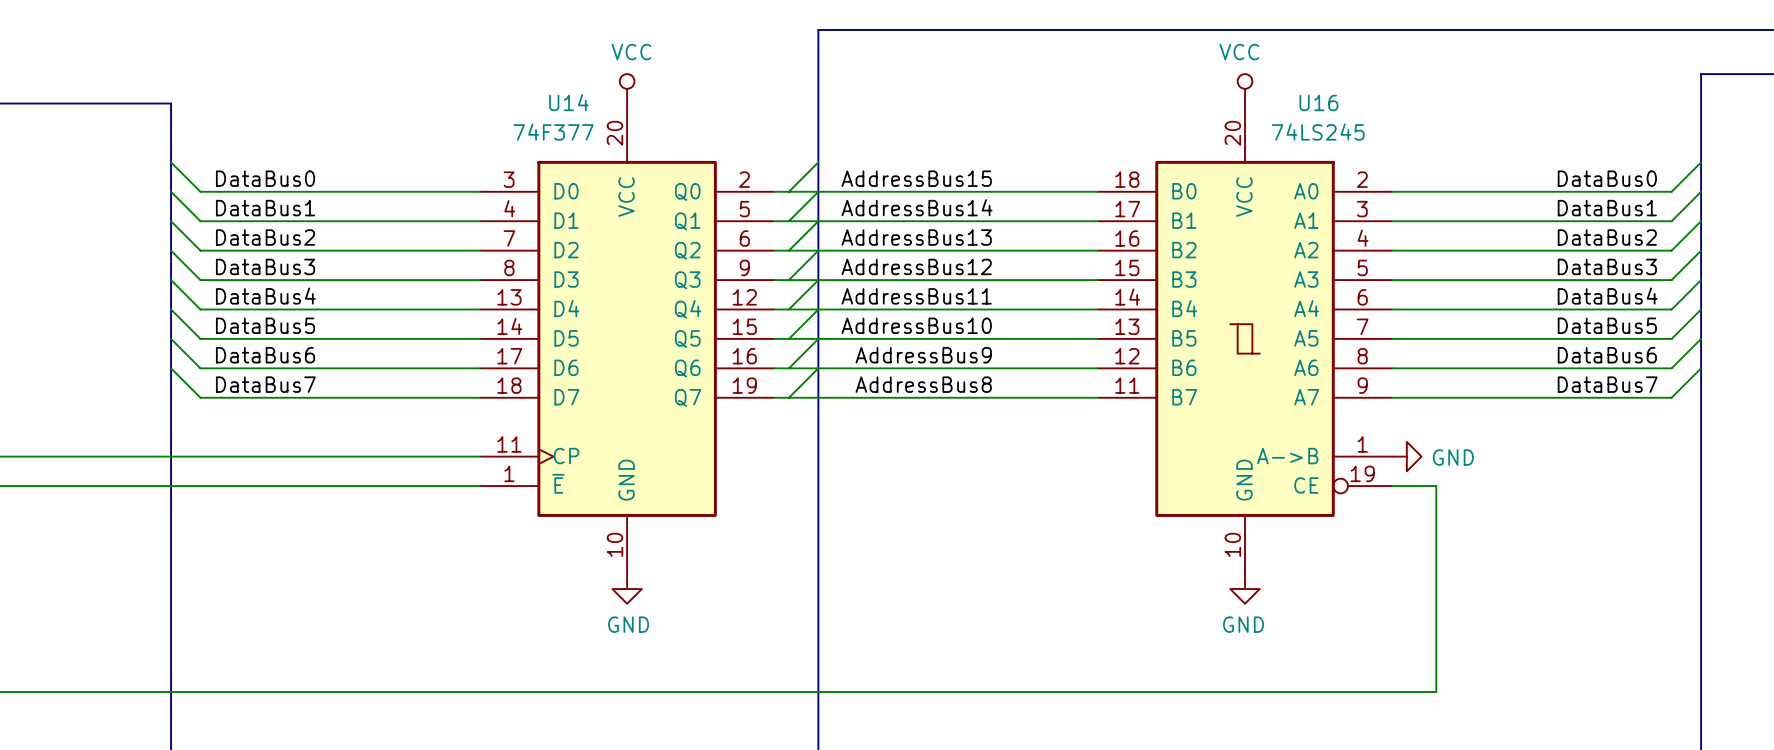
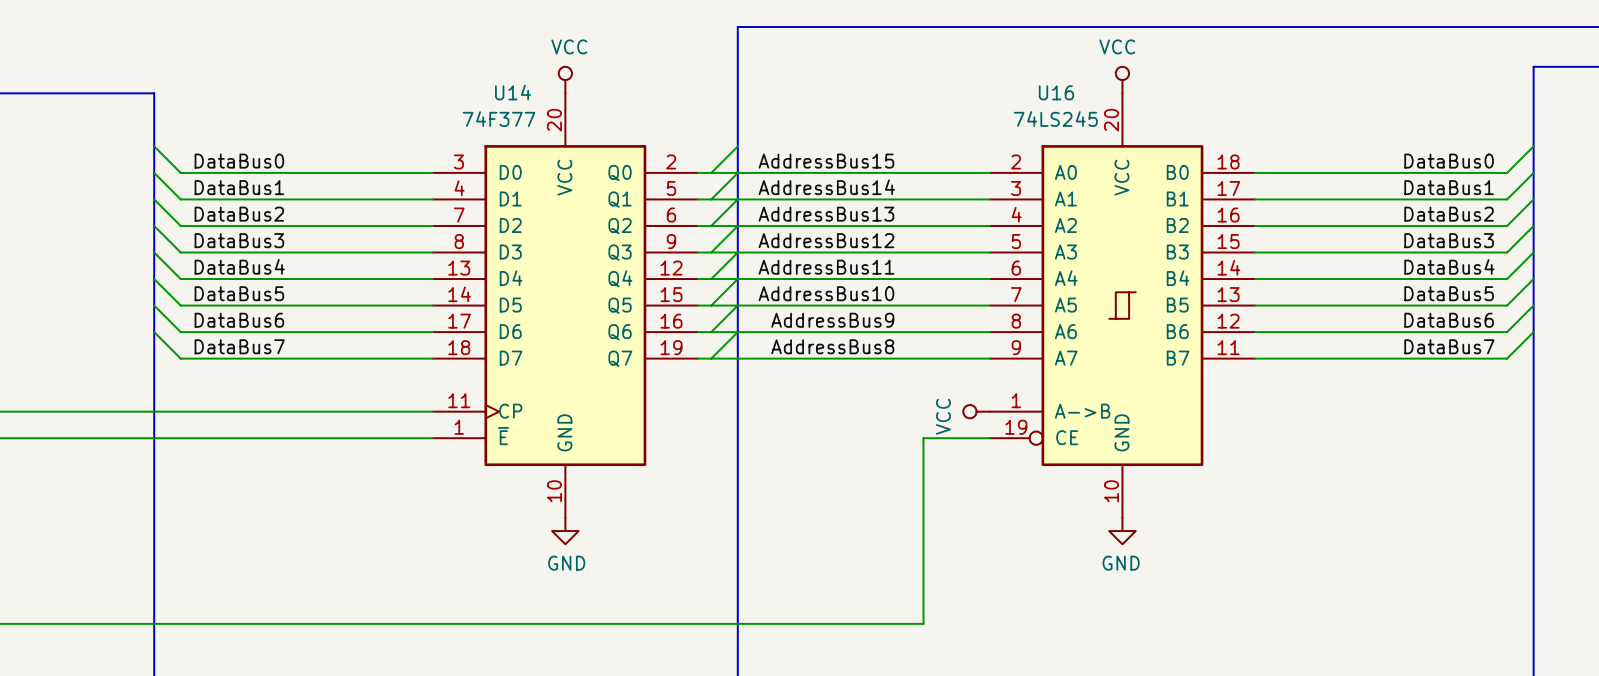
U16 flip: as is (1245, 338) -> left-right (1122, 305)
power symbol: none -> VCC (976, 411)
power symbol: GND (1406, 456) -> none
wire: (1392, 486) (1436, 486) (1436, 692) (1024, 692) -> (989, 438) (923, 438) (923, 623)

